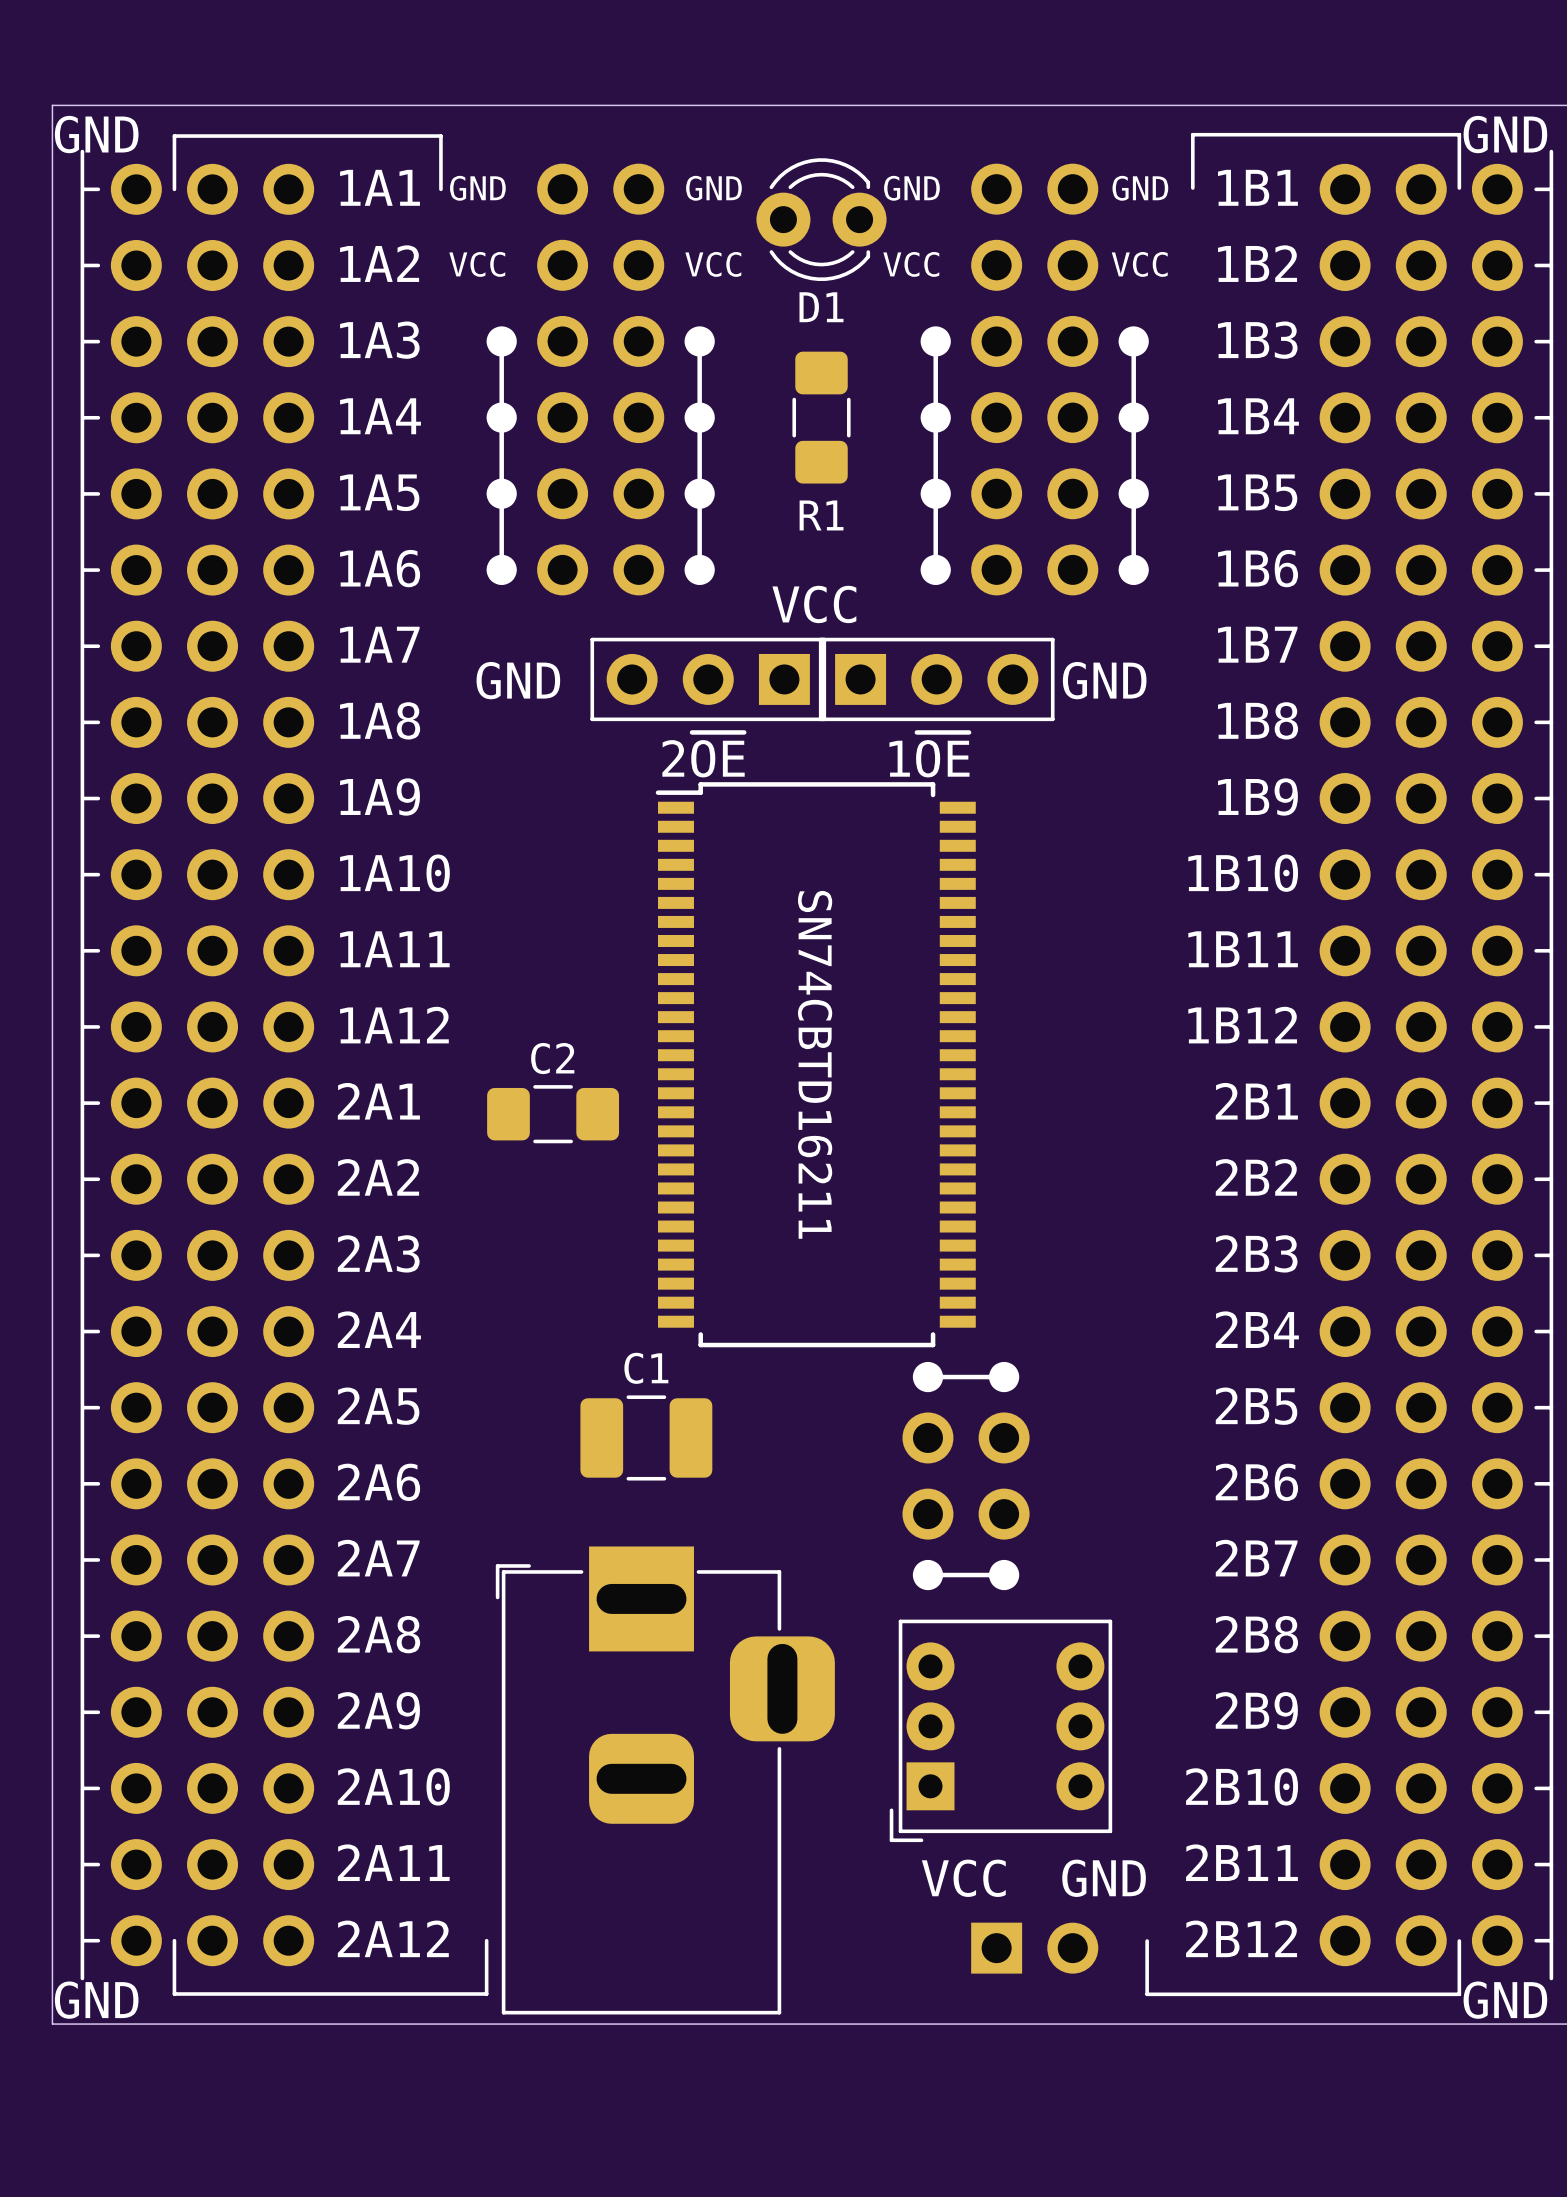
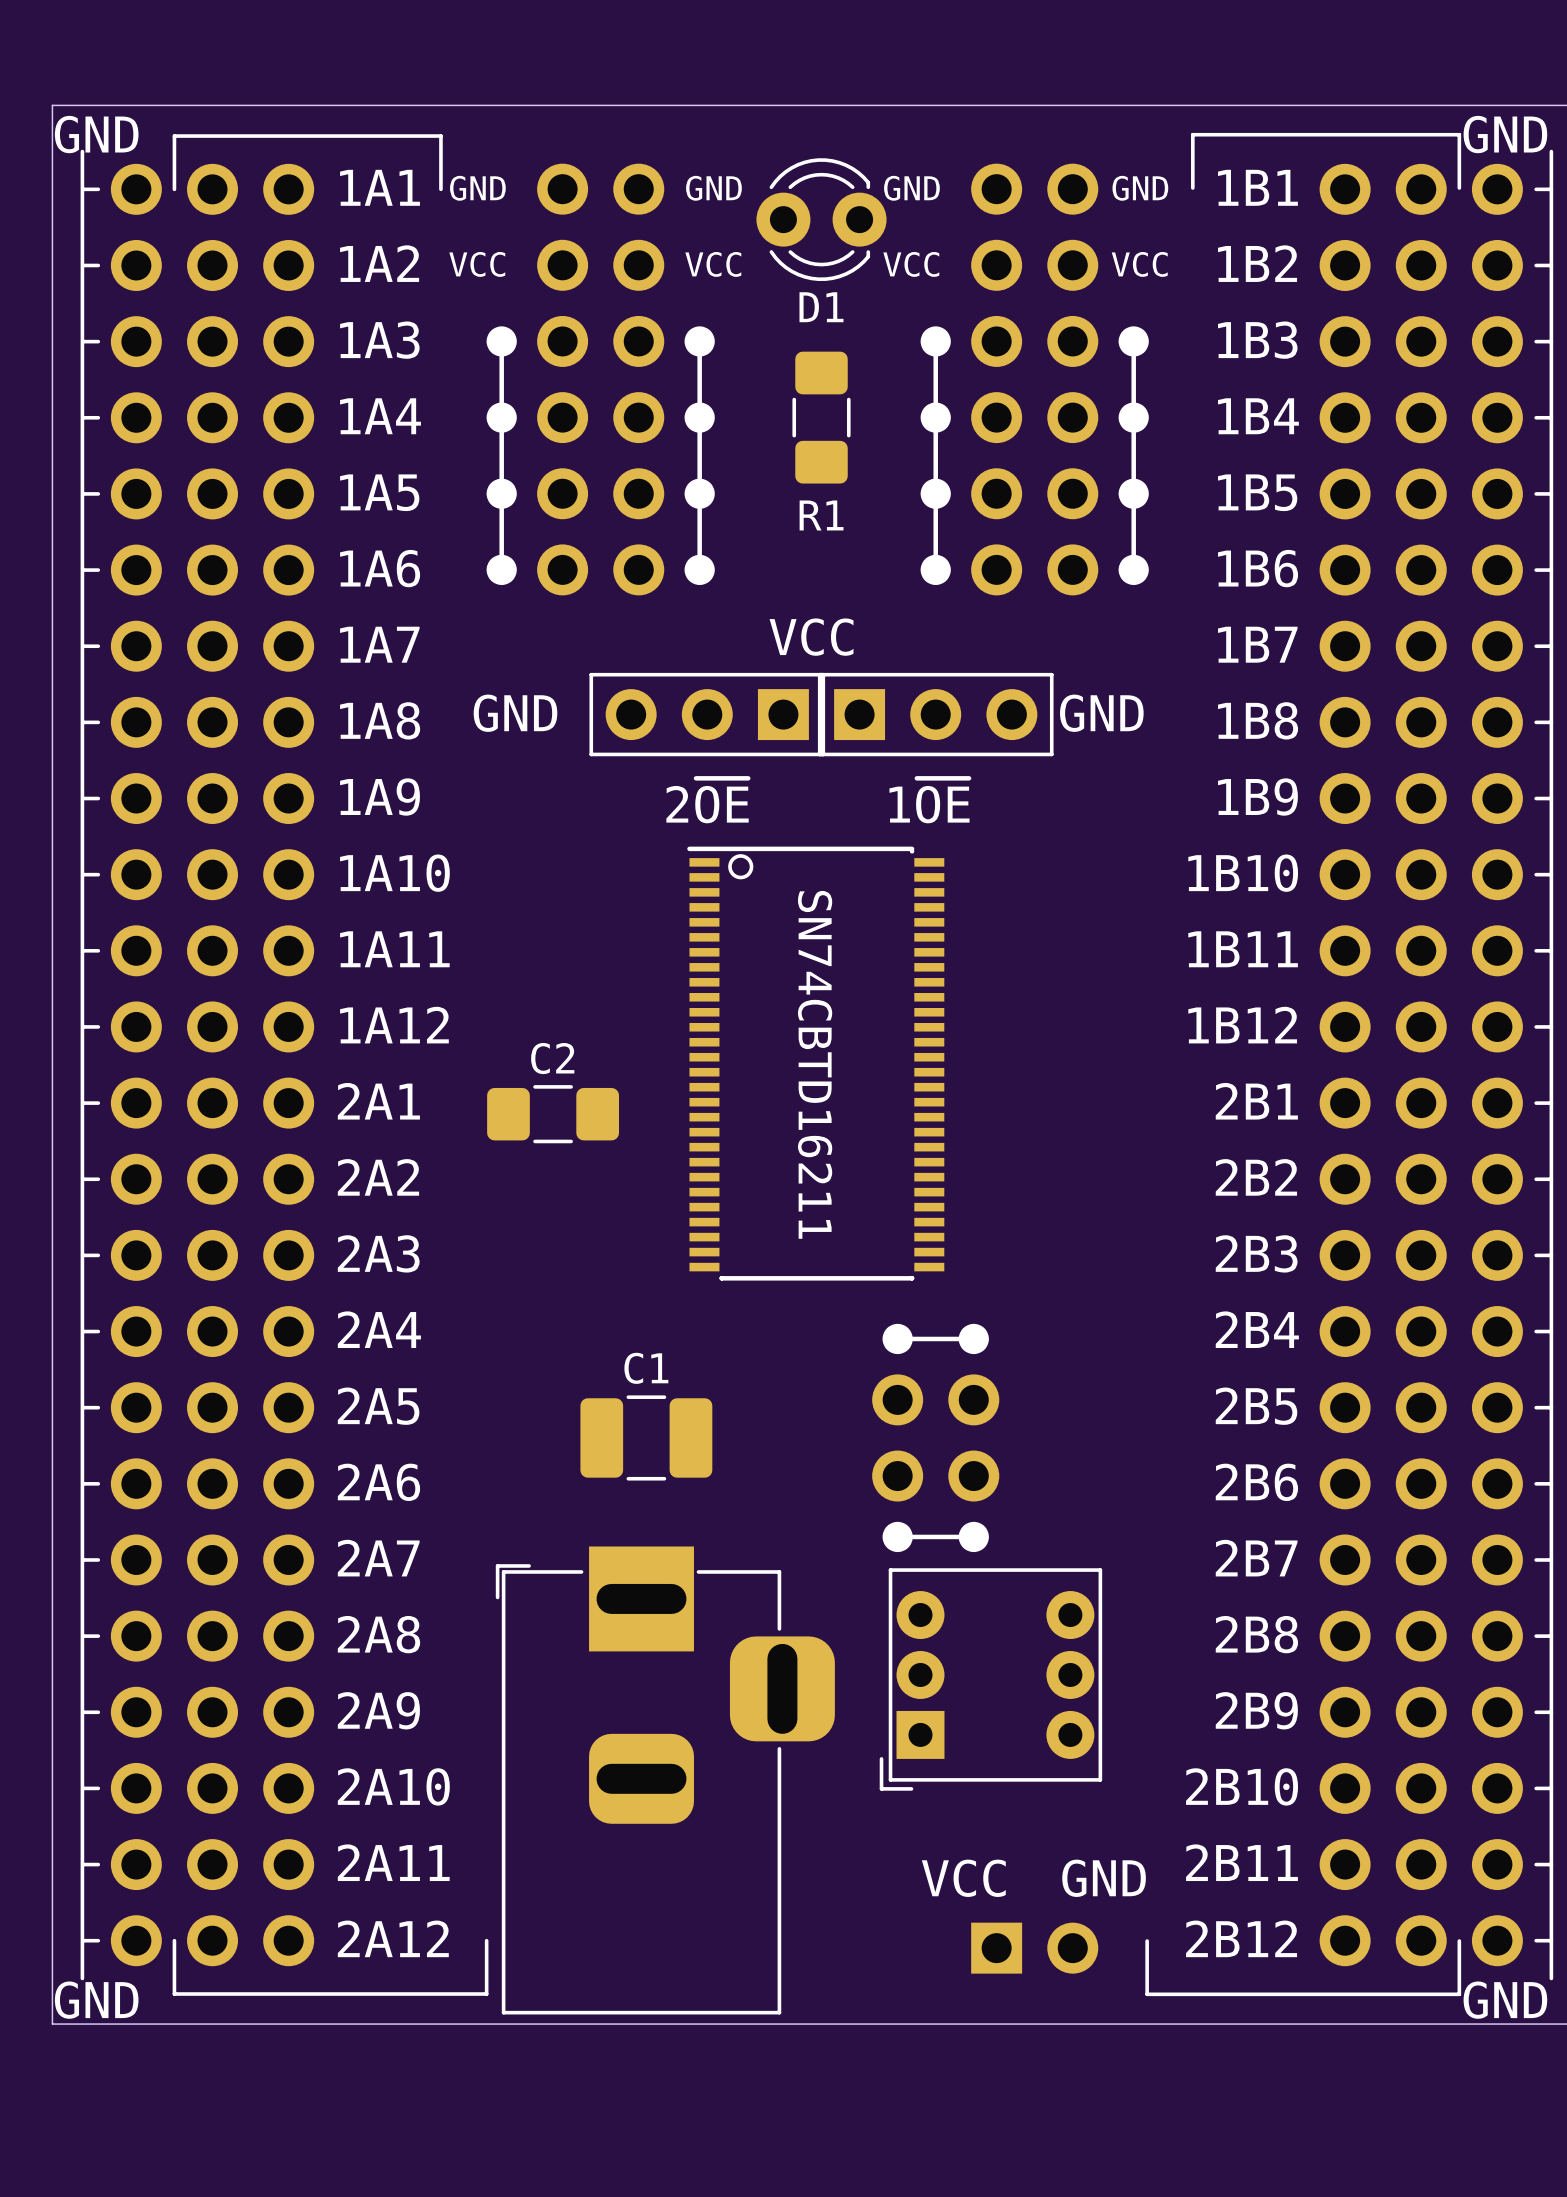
text position: VCC (814, 604) -> VCC (811, 637)
part position: (708, 679) -> (707, 714)
part position: (936, 679) -> (935, 714)
text position: GND (518, 680) -> GND (515, 713)
text position: GND (1104, 680) -> GND (1101, 713)
text position: 2~{OE} (703, 754) -> 2~{OE} (707, 800)
text position: 1~{OE} (929, 754) -> 1~{OE} (929, 800)
part footprint: [655, 782, 976, 1348] -> [687, 846, 945, 1281]
part position: (966, 1476) -> (935, 1437)
part position: (1000, 1730) -> (990, 1679)

